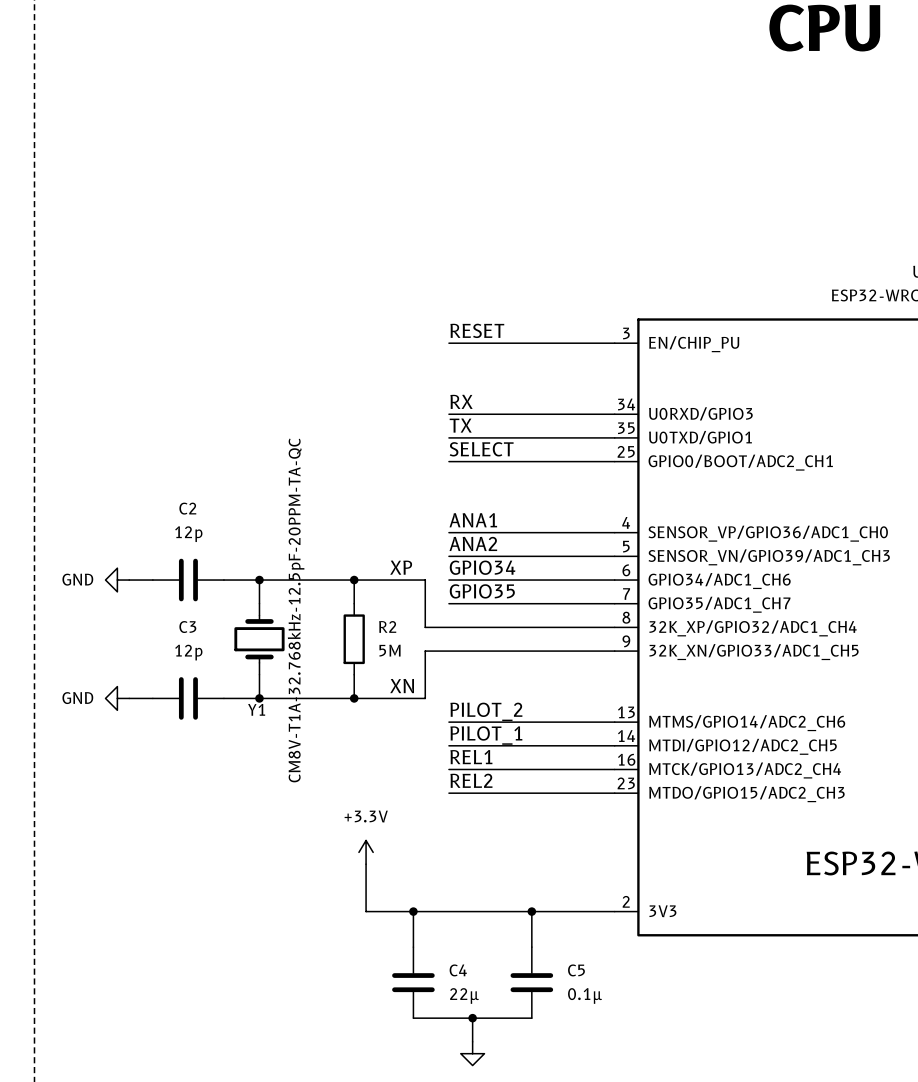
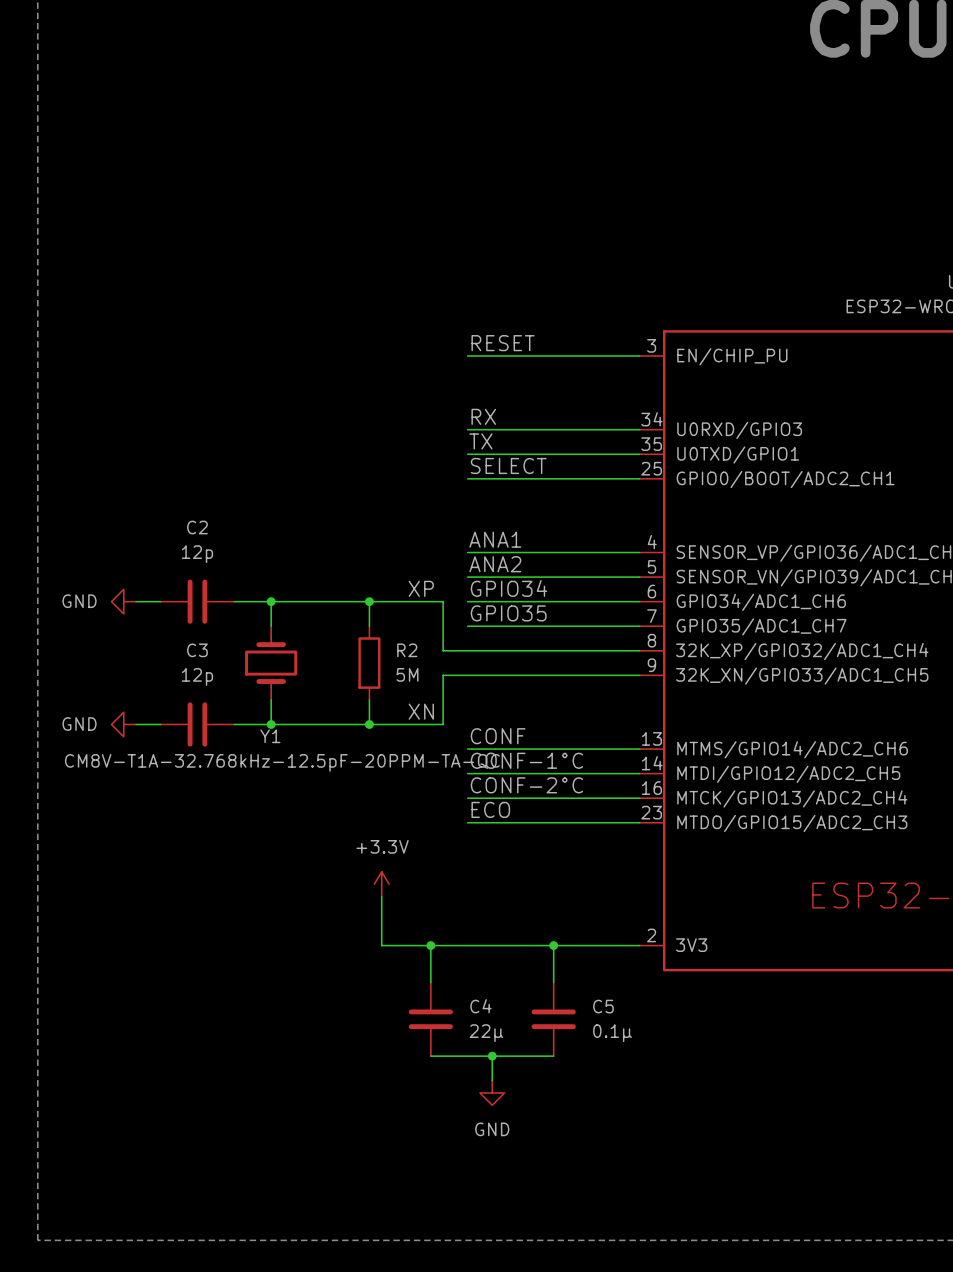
Y1 value rotation: 0° (296, 610) -> 90° clockwise (282, 762)
label: PILOT_2 (486, 711) -> CONF (498, 736)
label: PILOT_1 (486, 735) -> CONF-1°C (526, 760)
label: REL1 (471, 757) -> CONF-2°C (526, 785)
label: REL2 (471, 780) -> ECO (490, 809)

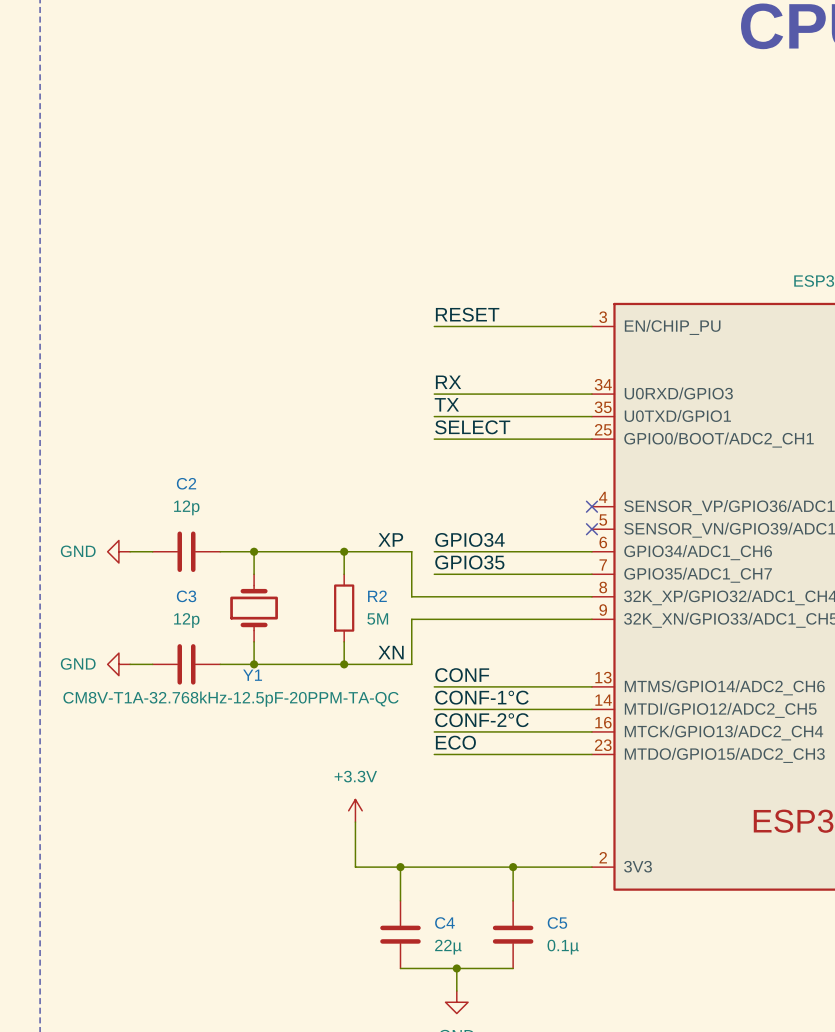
label: ANA1 (495, 539) -> none
wire: (467, 552) (639, 552) -> none
no-connect mark: none -> (591, 506)
label: ANA2 (495, 564) -> none
wire: (467, 577) (639, 577) -> none
no-connect mark: none -> (591, 529)

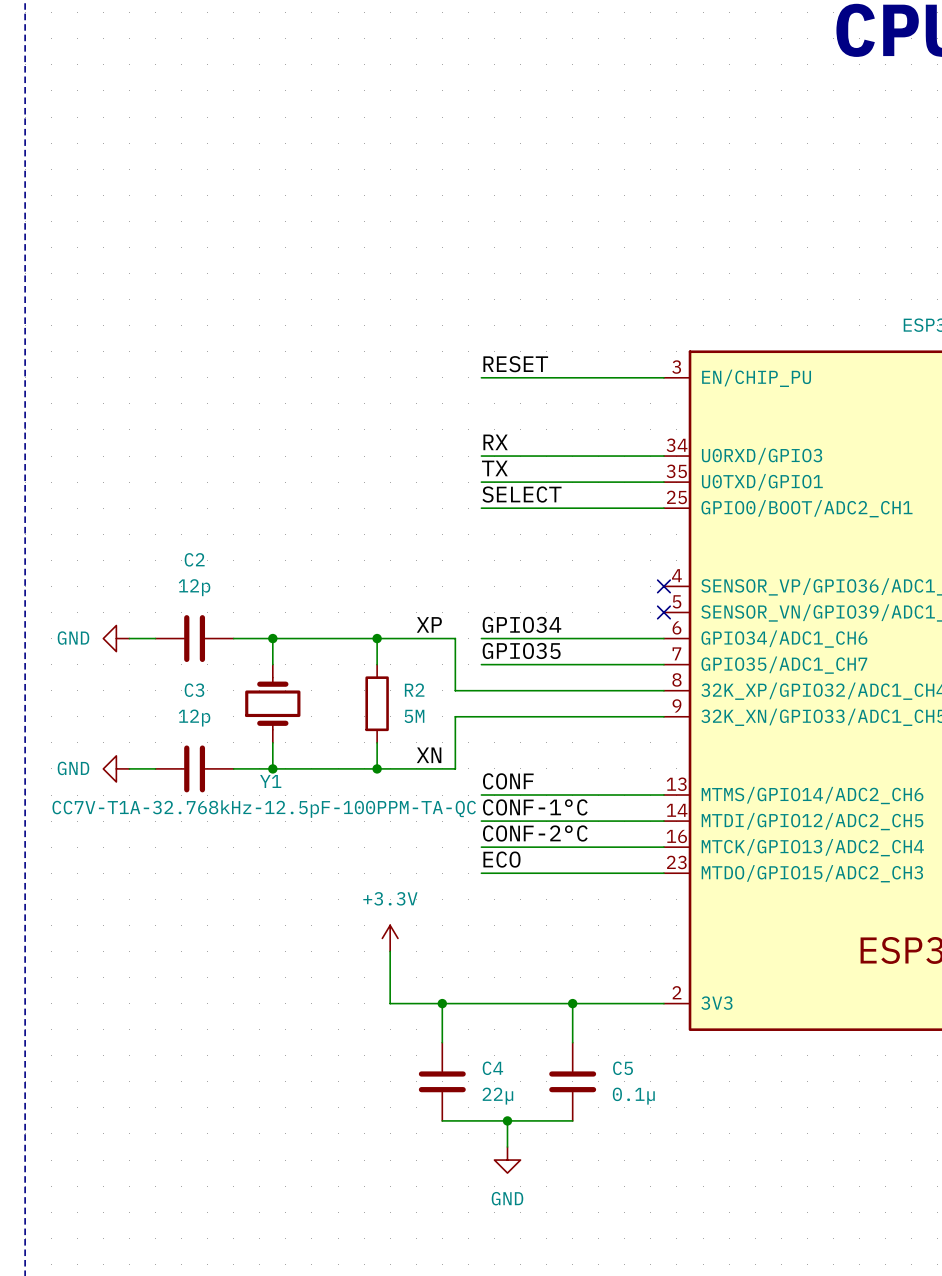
Y1 value: CM8V-T1A-32.768kHz-12.5pF-20PPM-TA-QC (231, 699) -> CC7V-T1A-32.768kHz-12.5pF-100PPM-TA-QC (264, 809)

